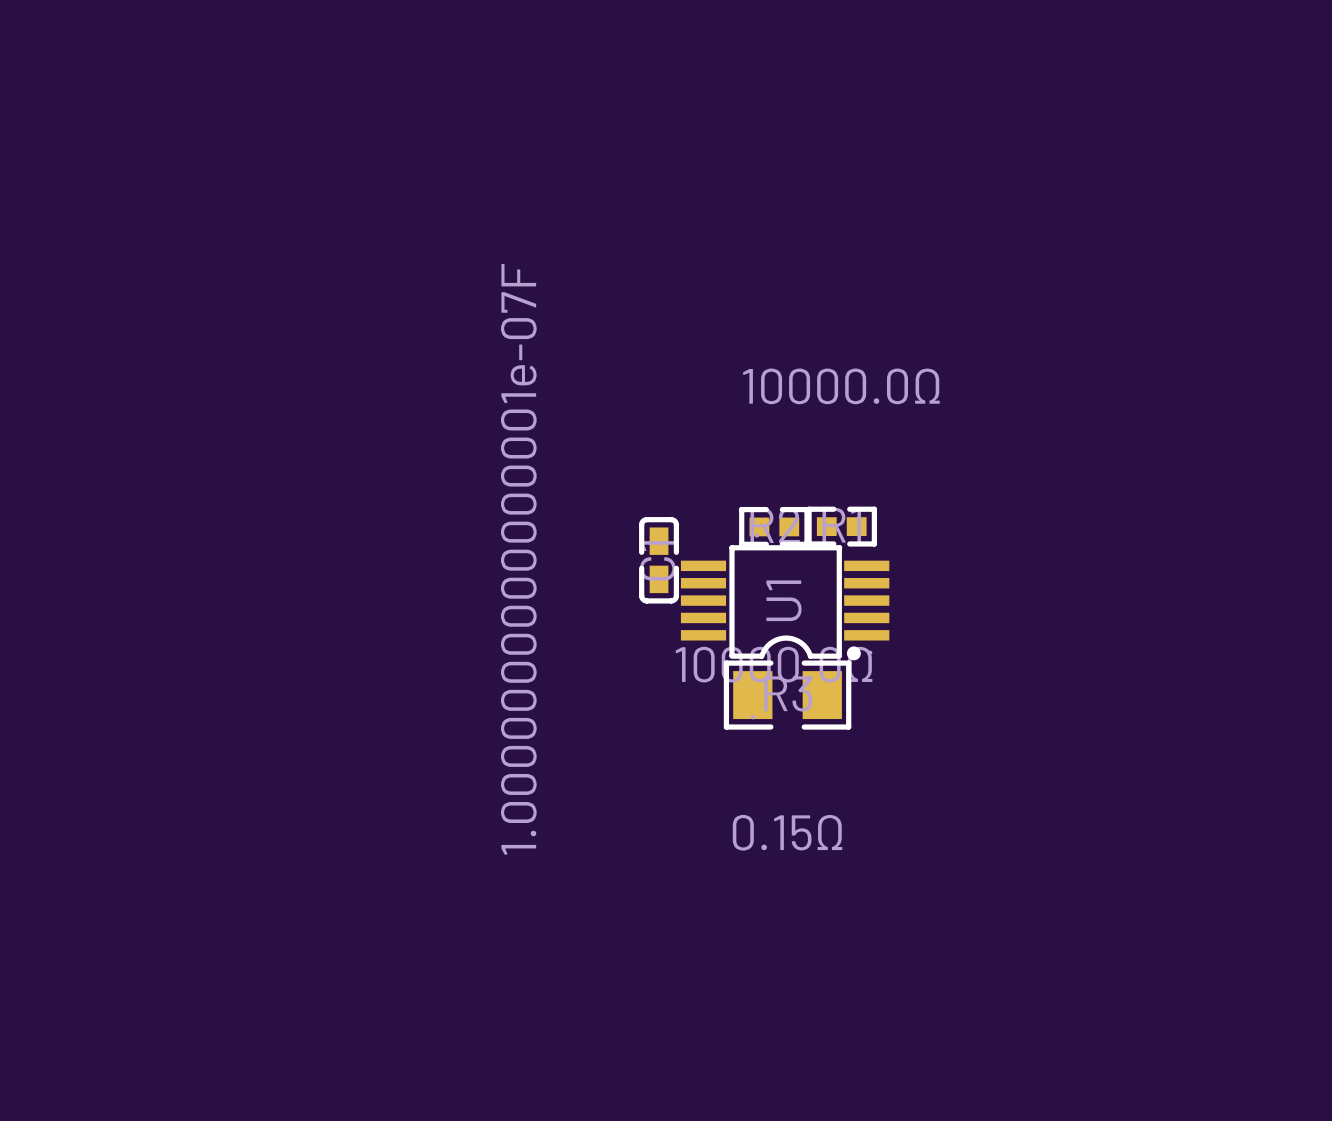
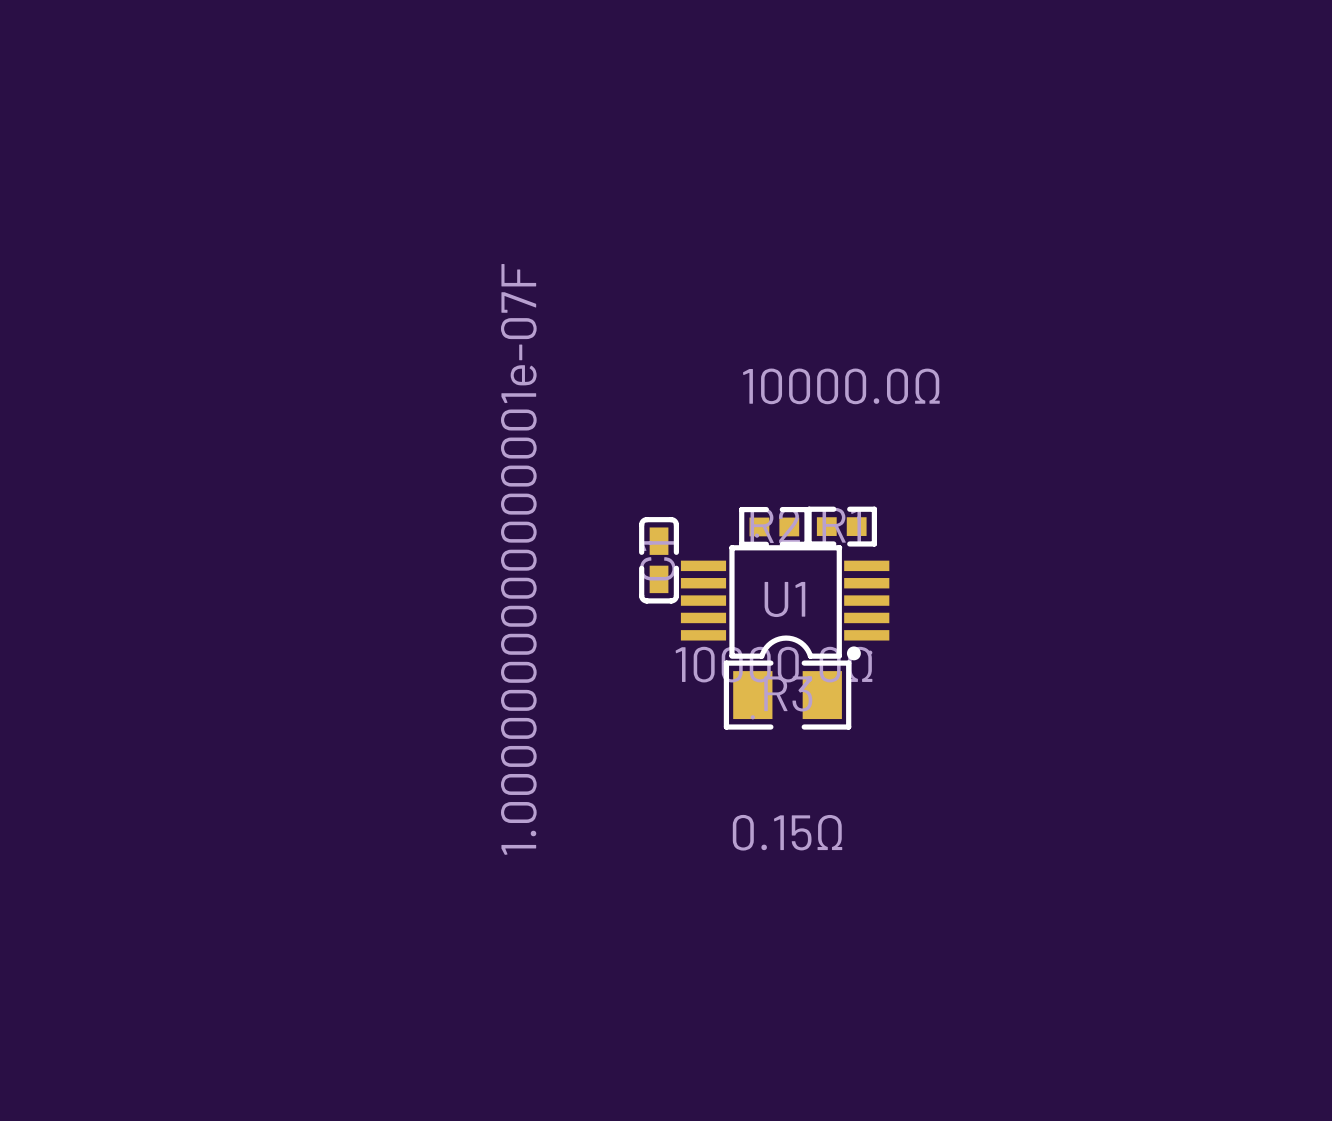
U1 name rotation: 0° (784, 600) -> 90° clockwise (784, 599)

